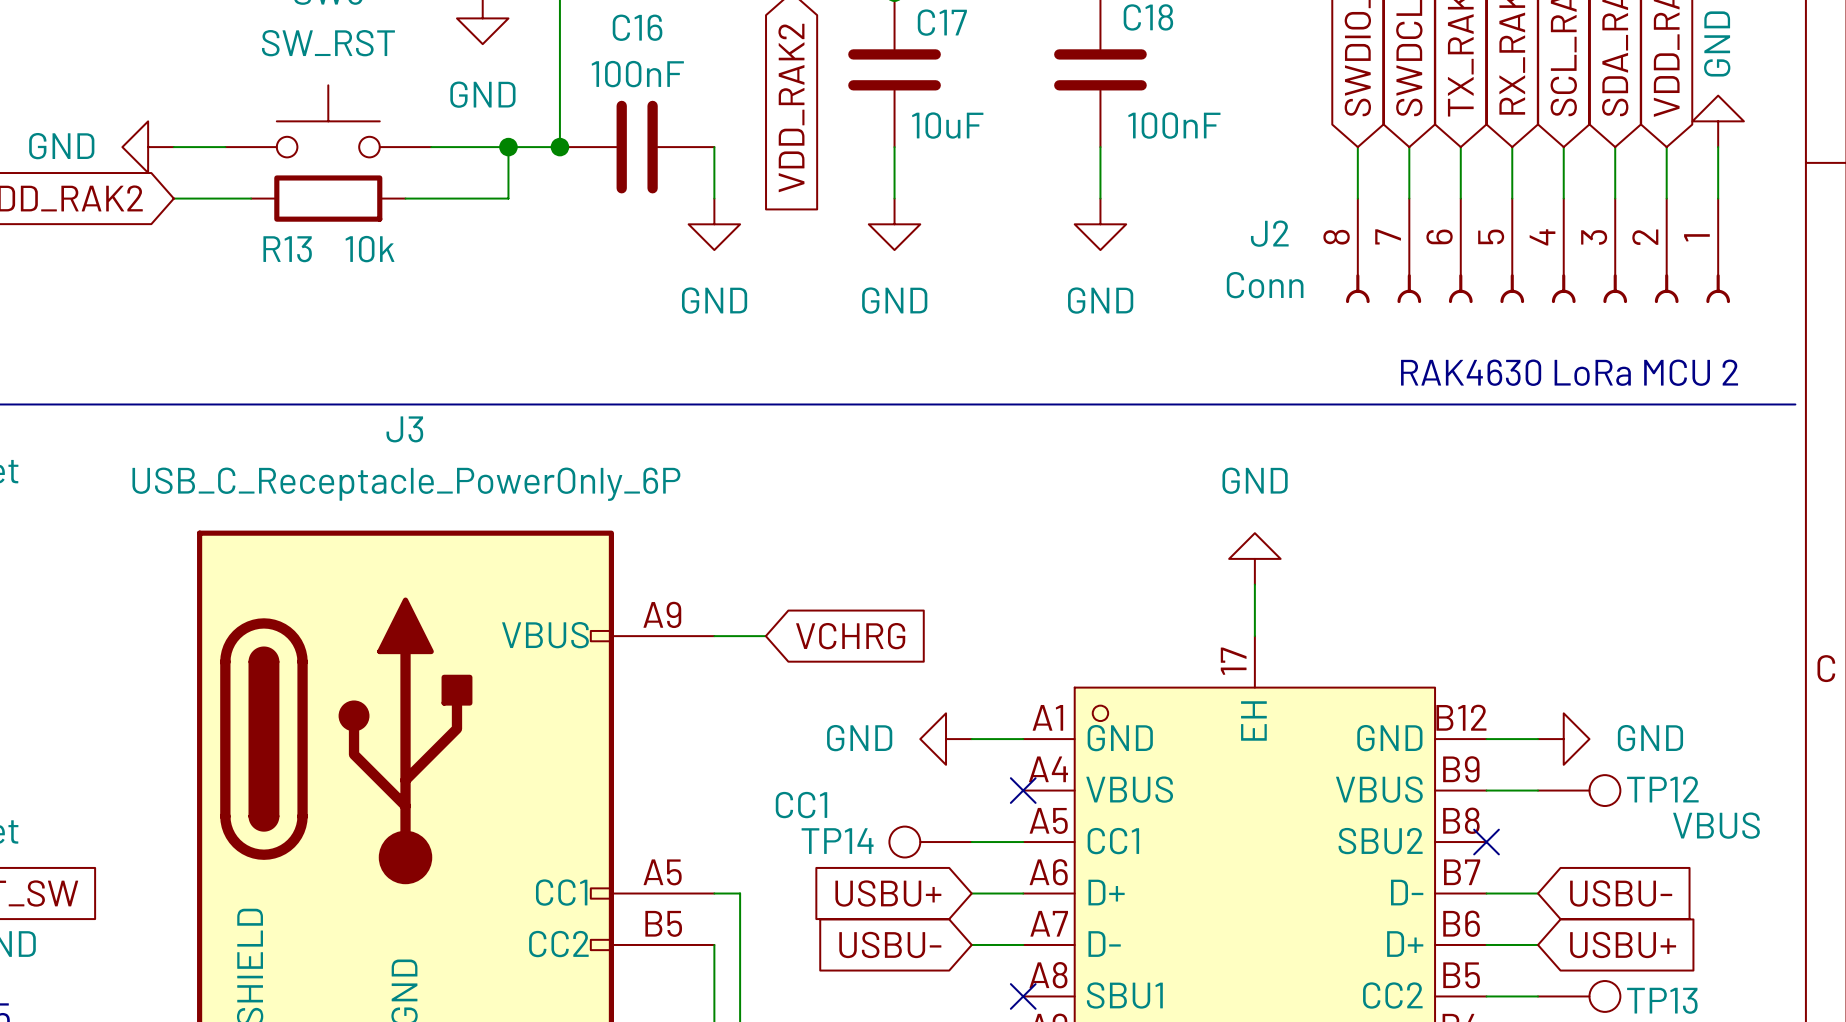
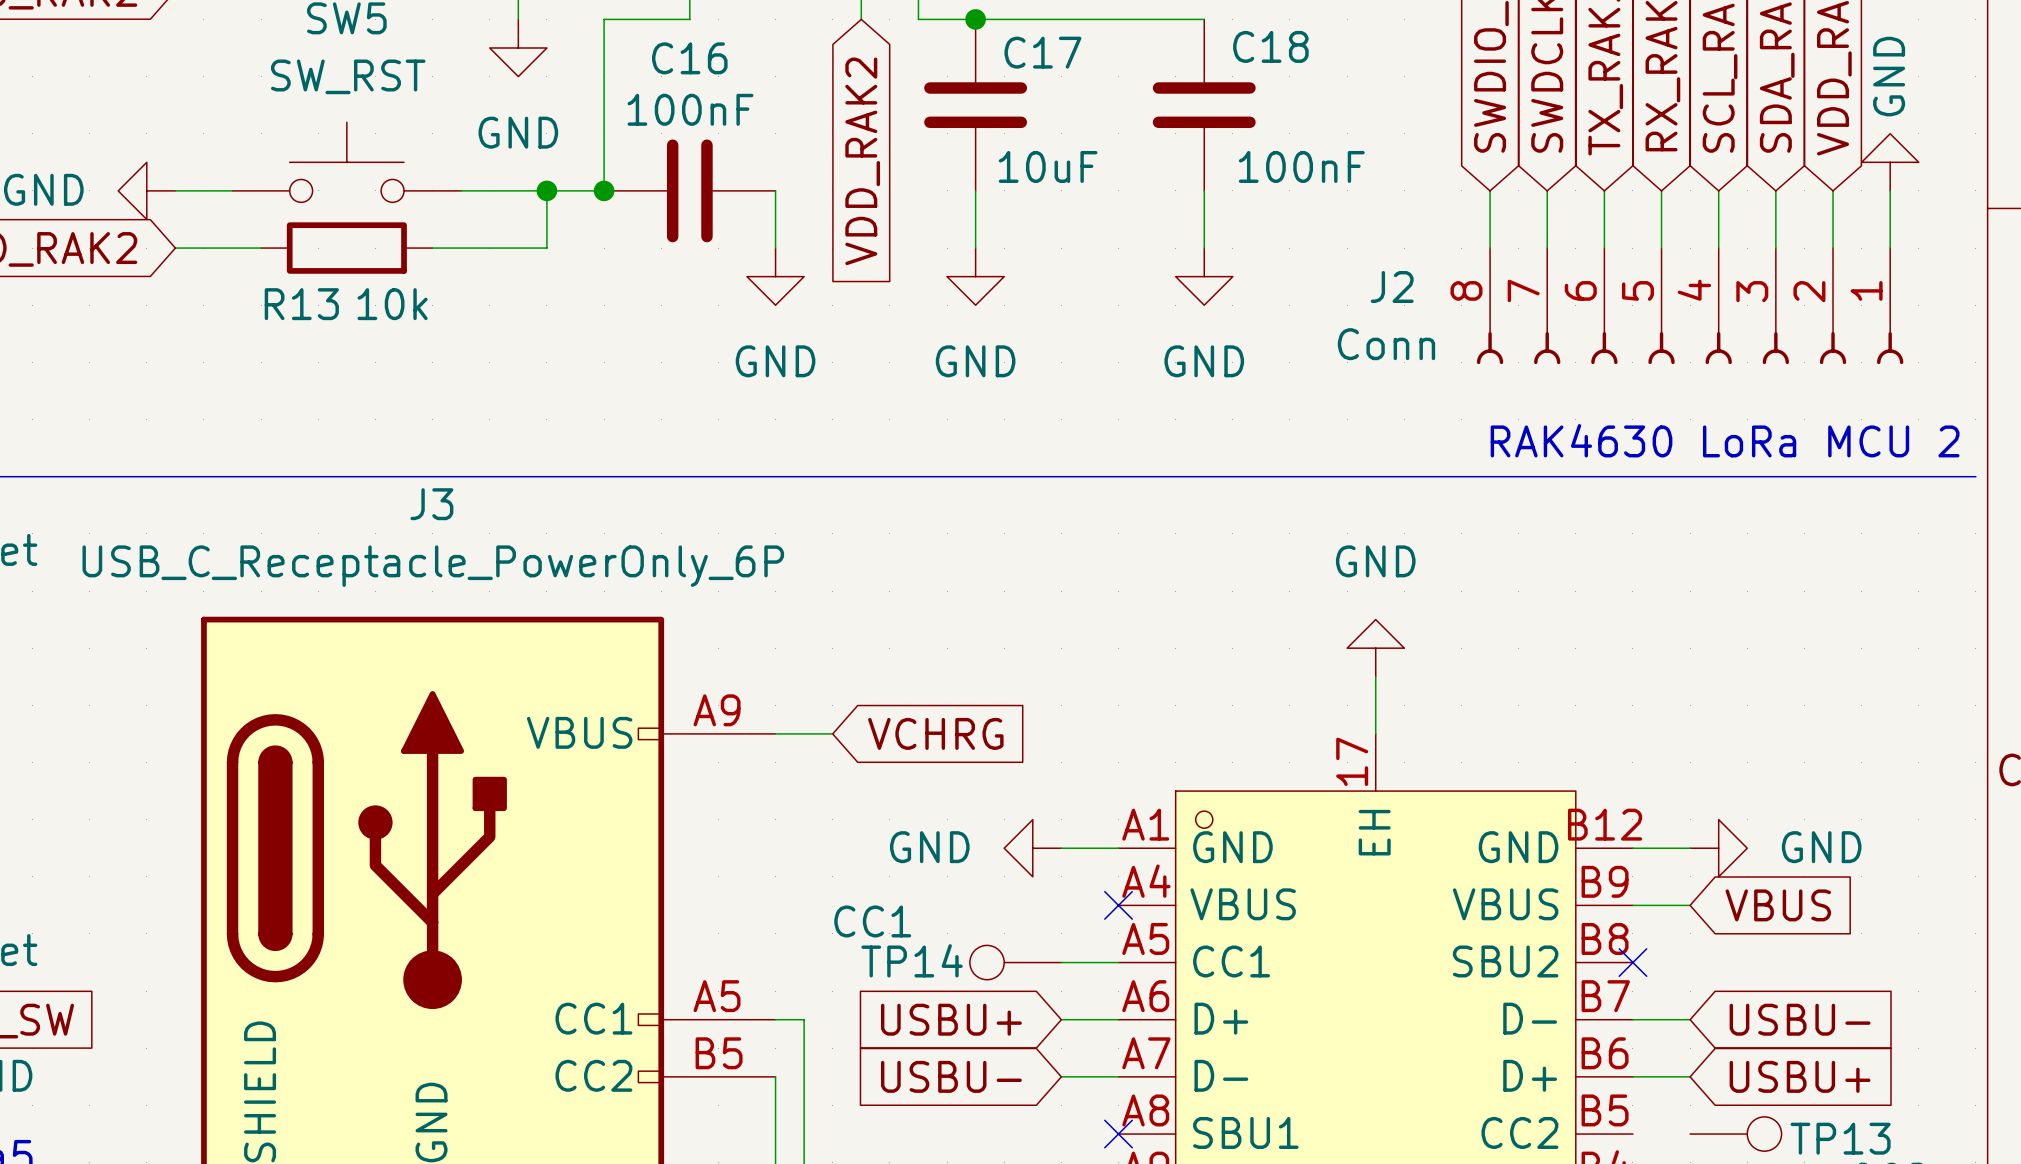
TP12: VBUS (1579, 790) -> none
global label: none -> VBUS (1778, 905)
wire: (1486, 996) (1538, 996) -> none

